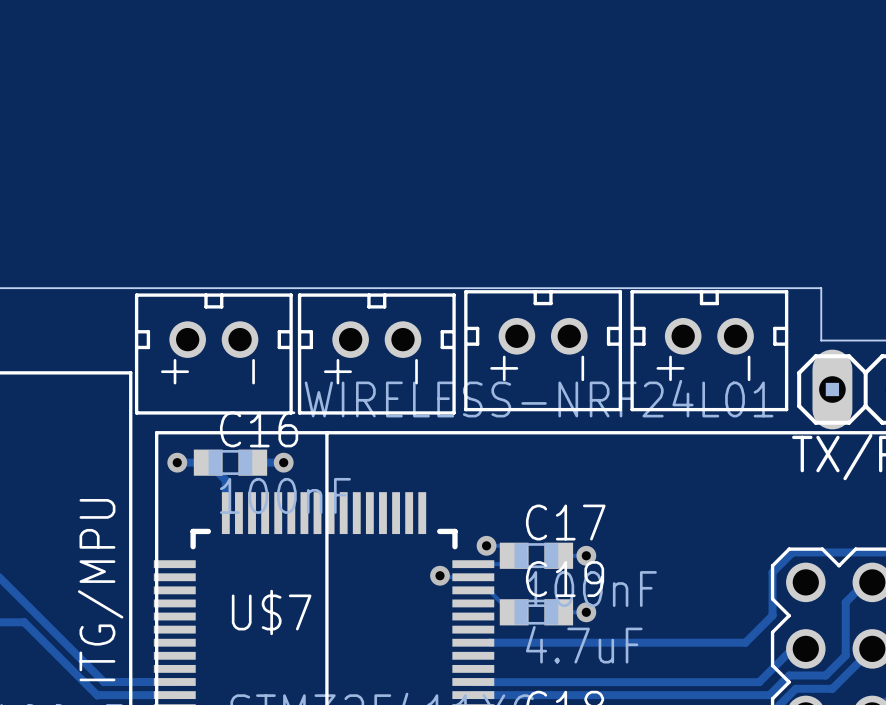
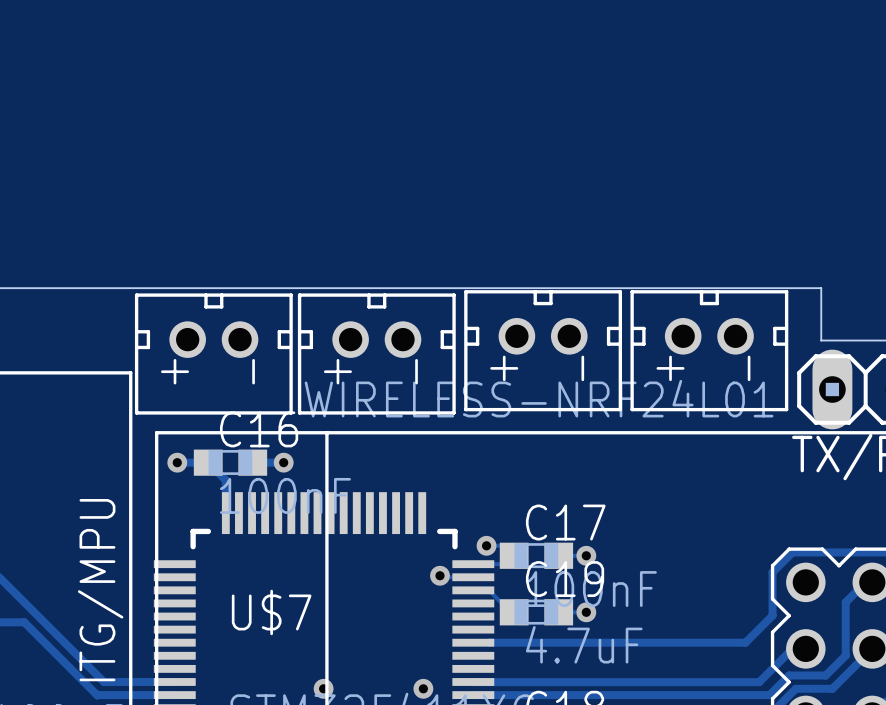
via: none -> (323, 688)
via: none -> (423, 688)

